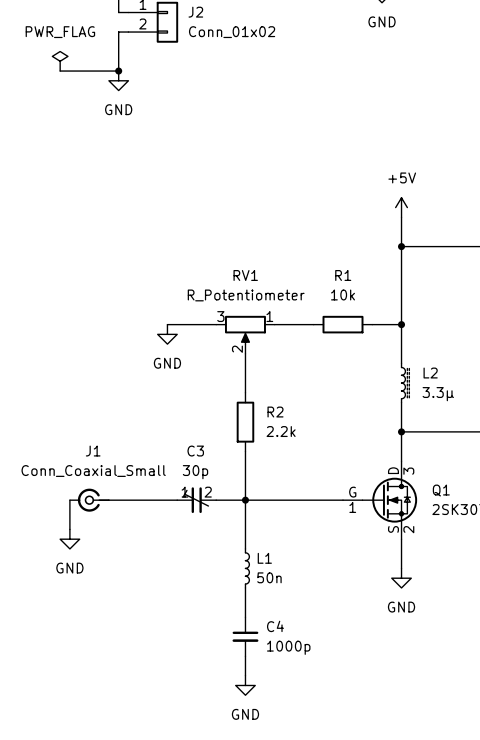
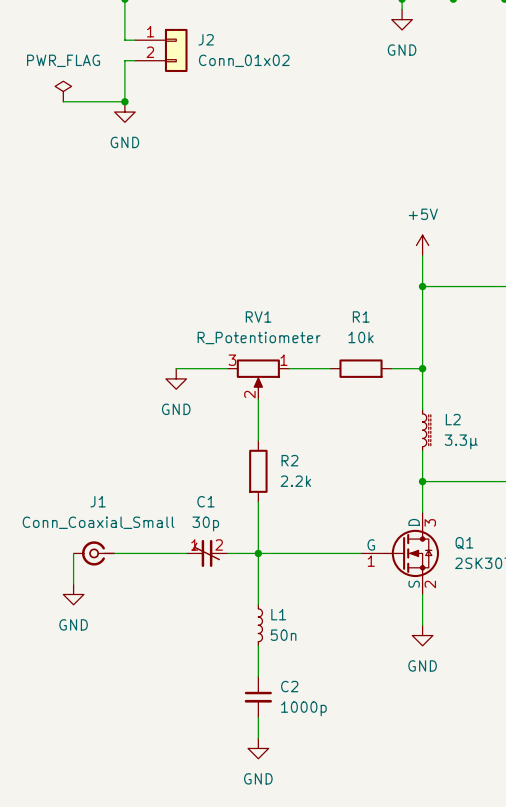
C3 name: C3 (195, 451) -> C1 (206, 501)
C4 name: C4 (275, 626) -> C2 (289, 686)

